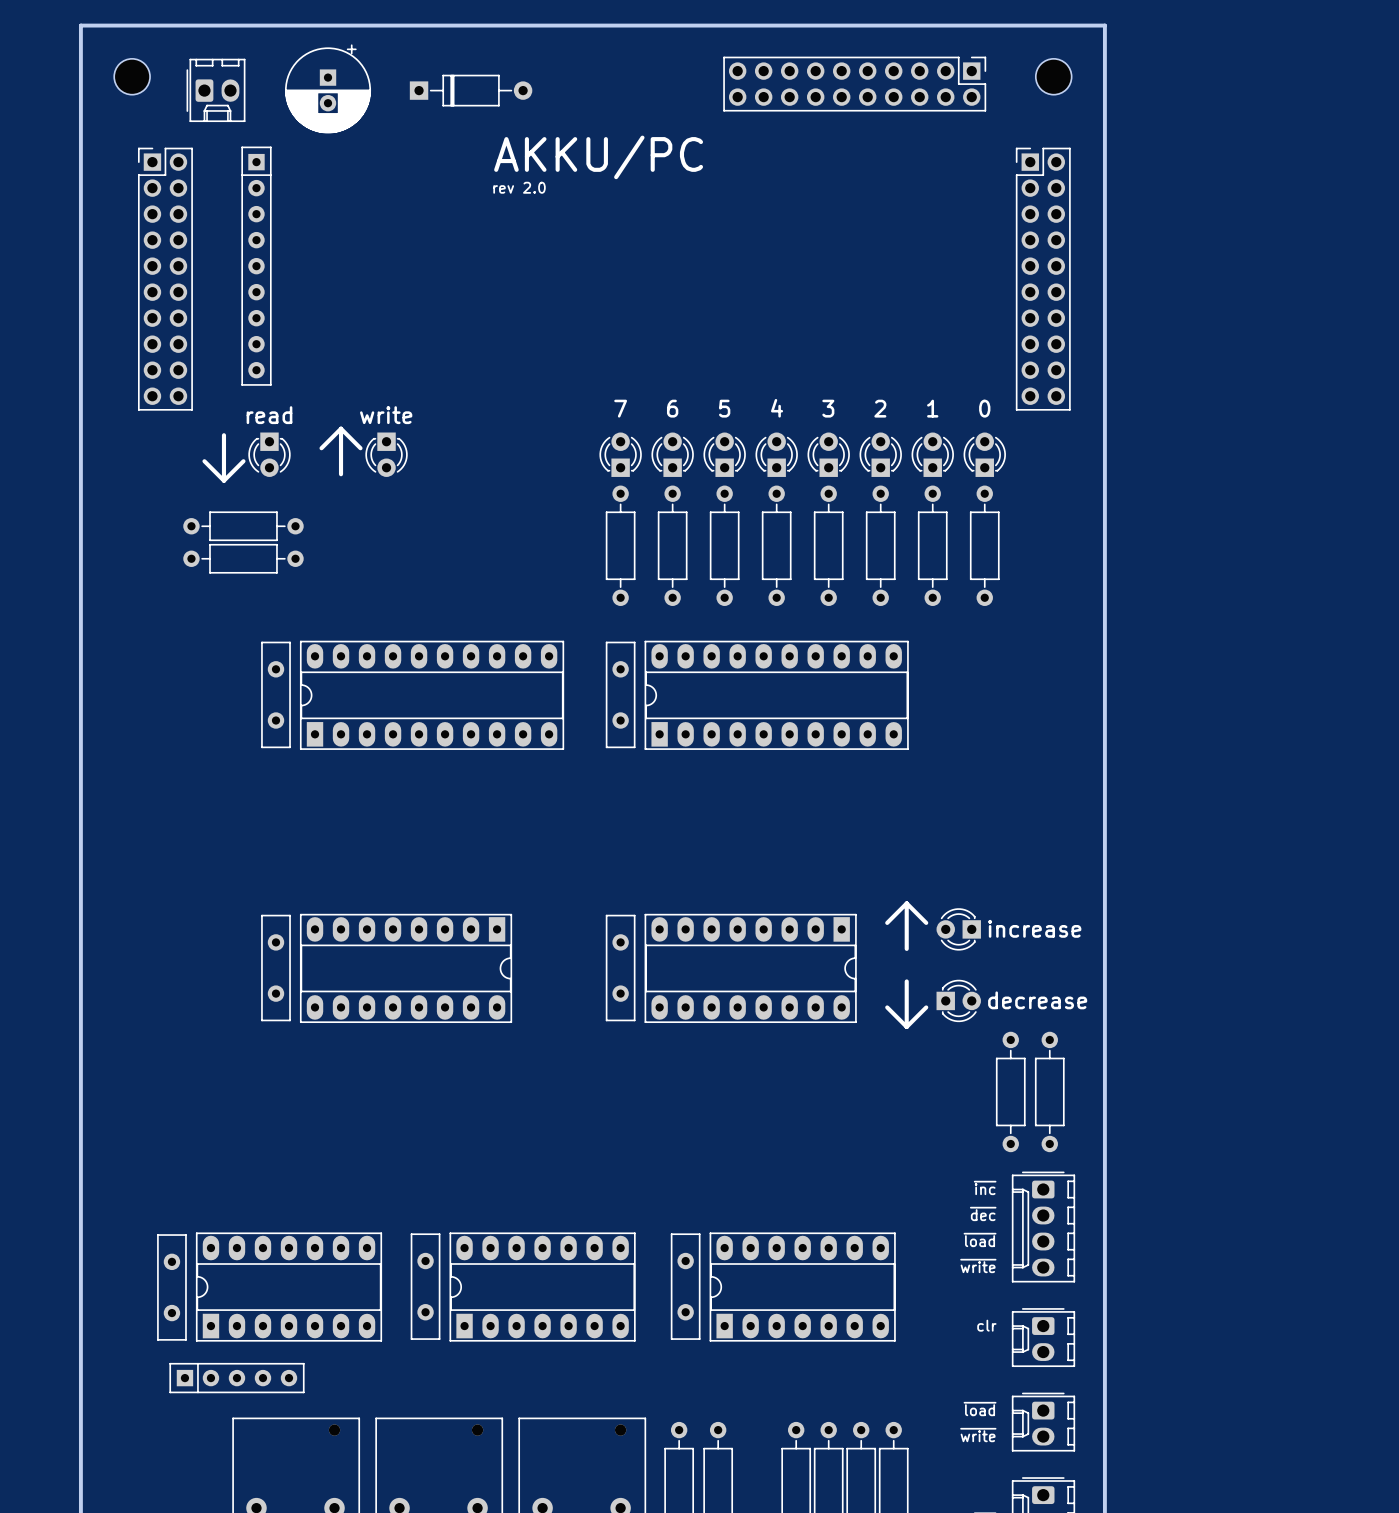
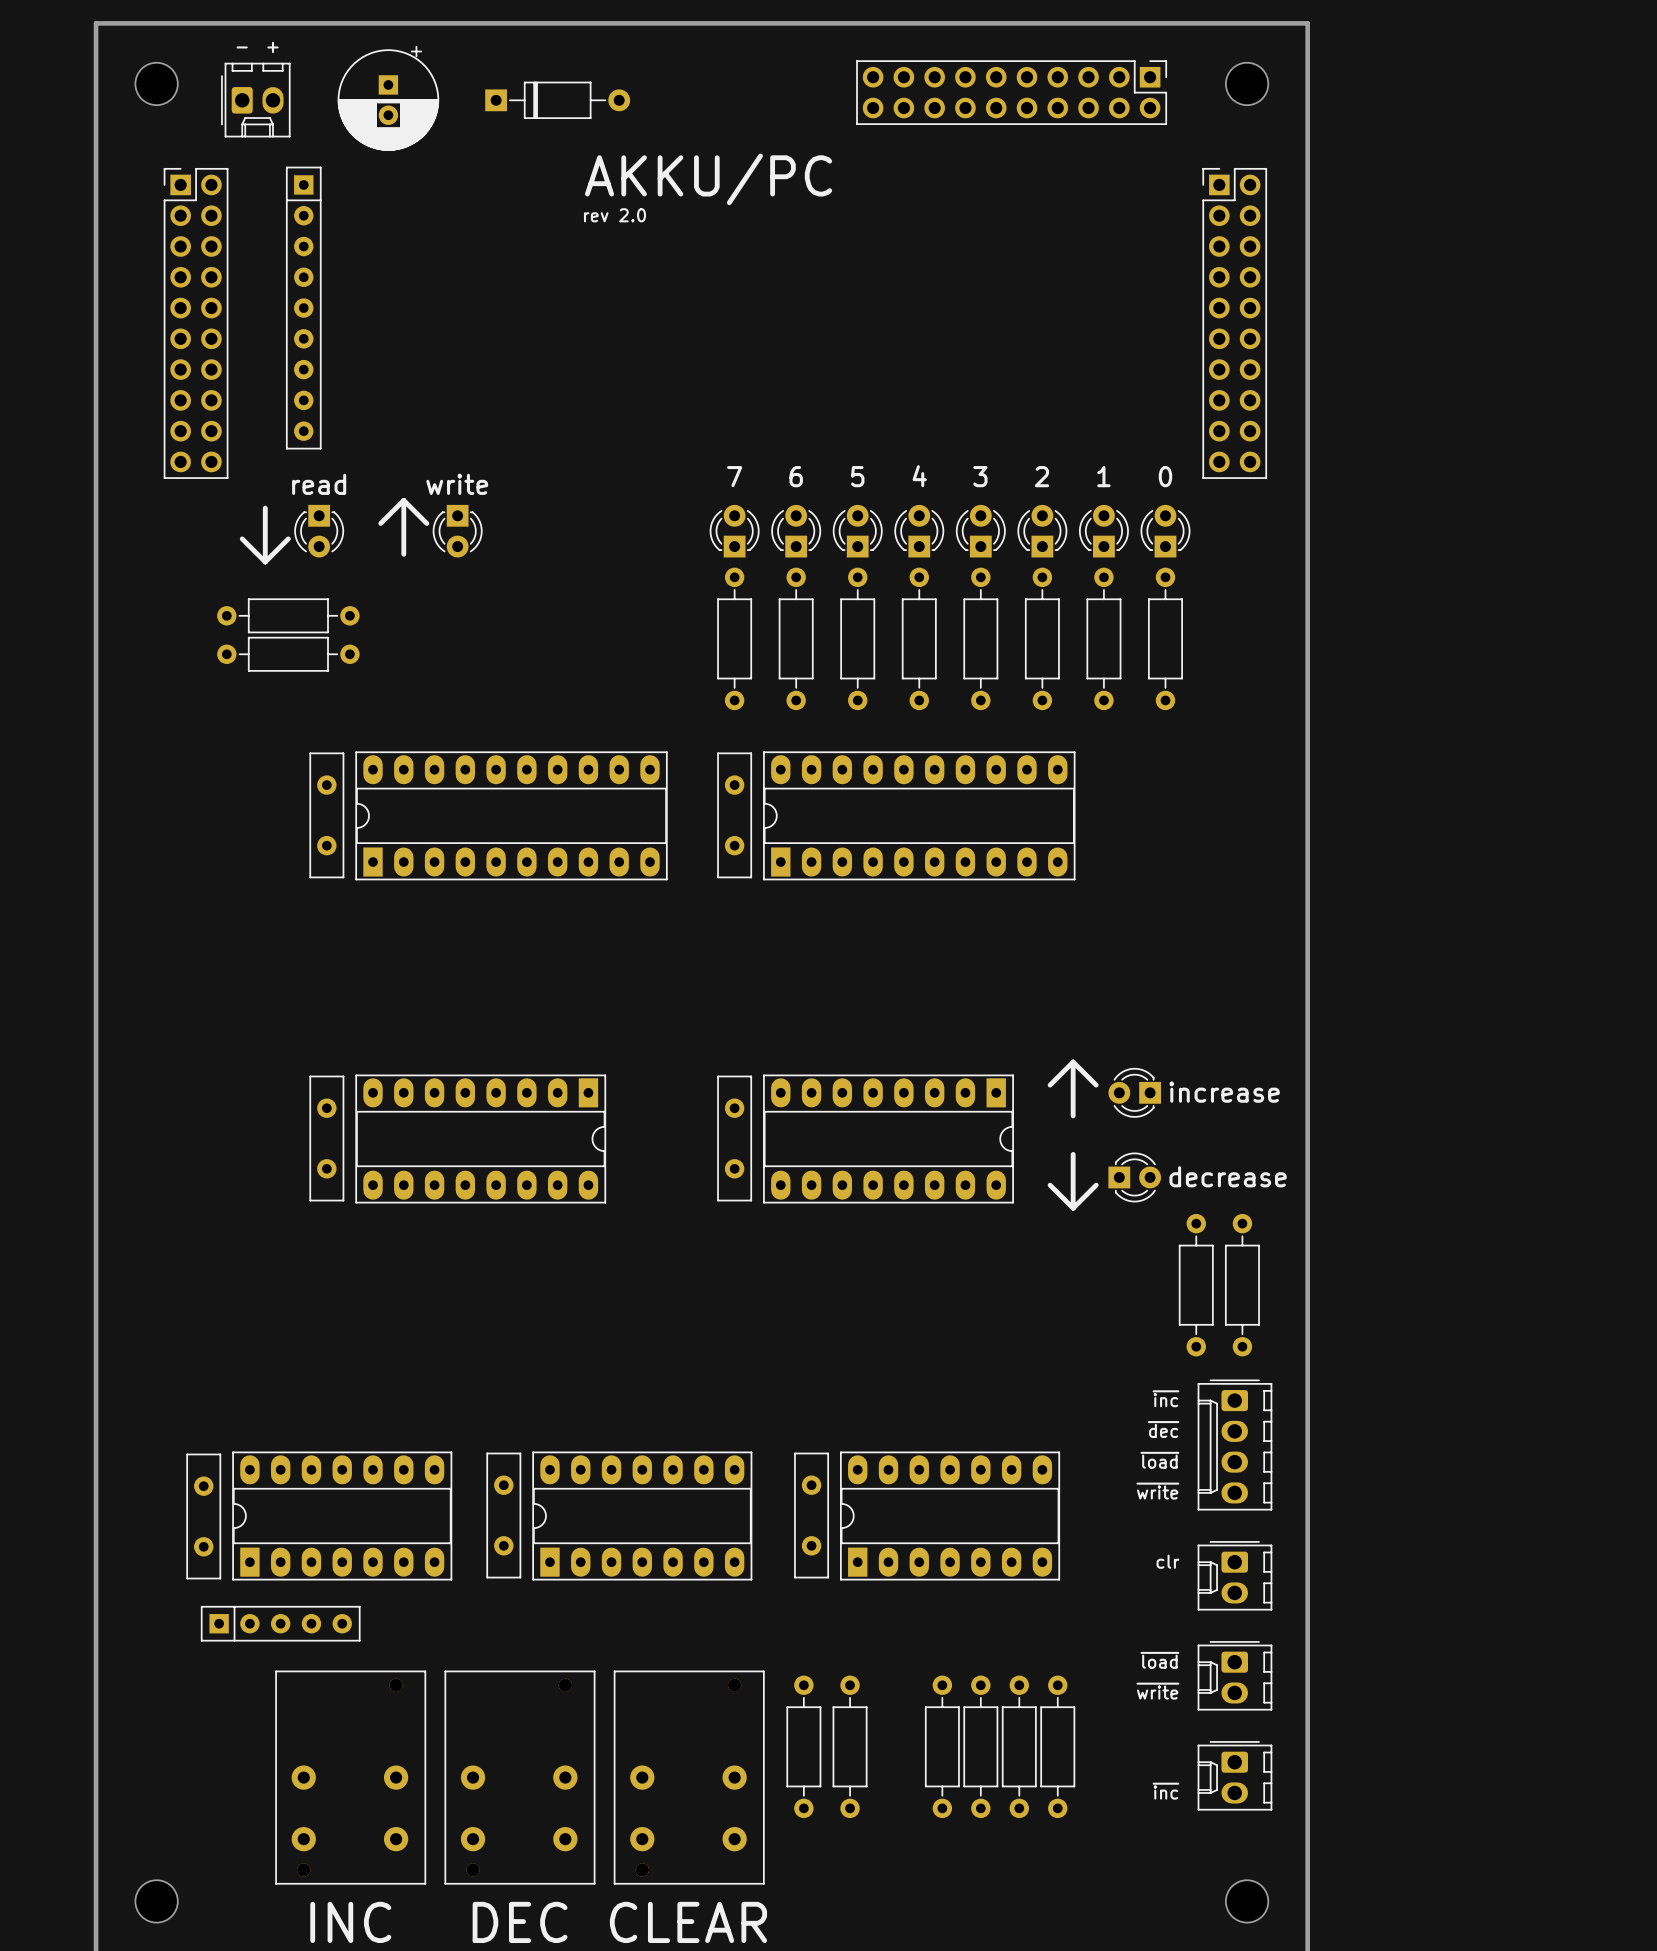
text: none -> - (242, 47)
text: none -> + (272, 47)

